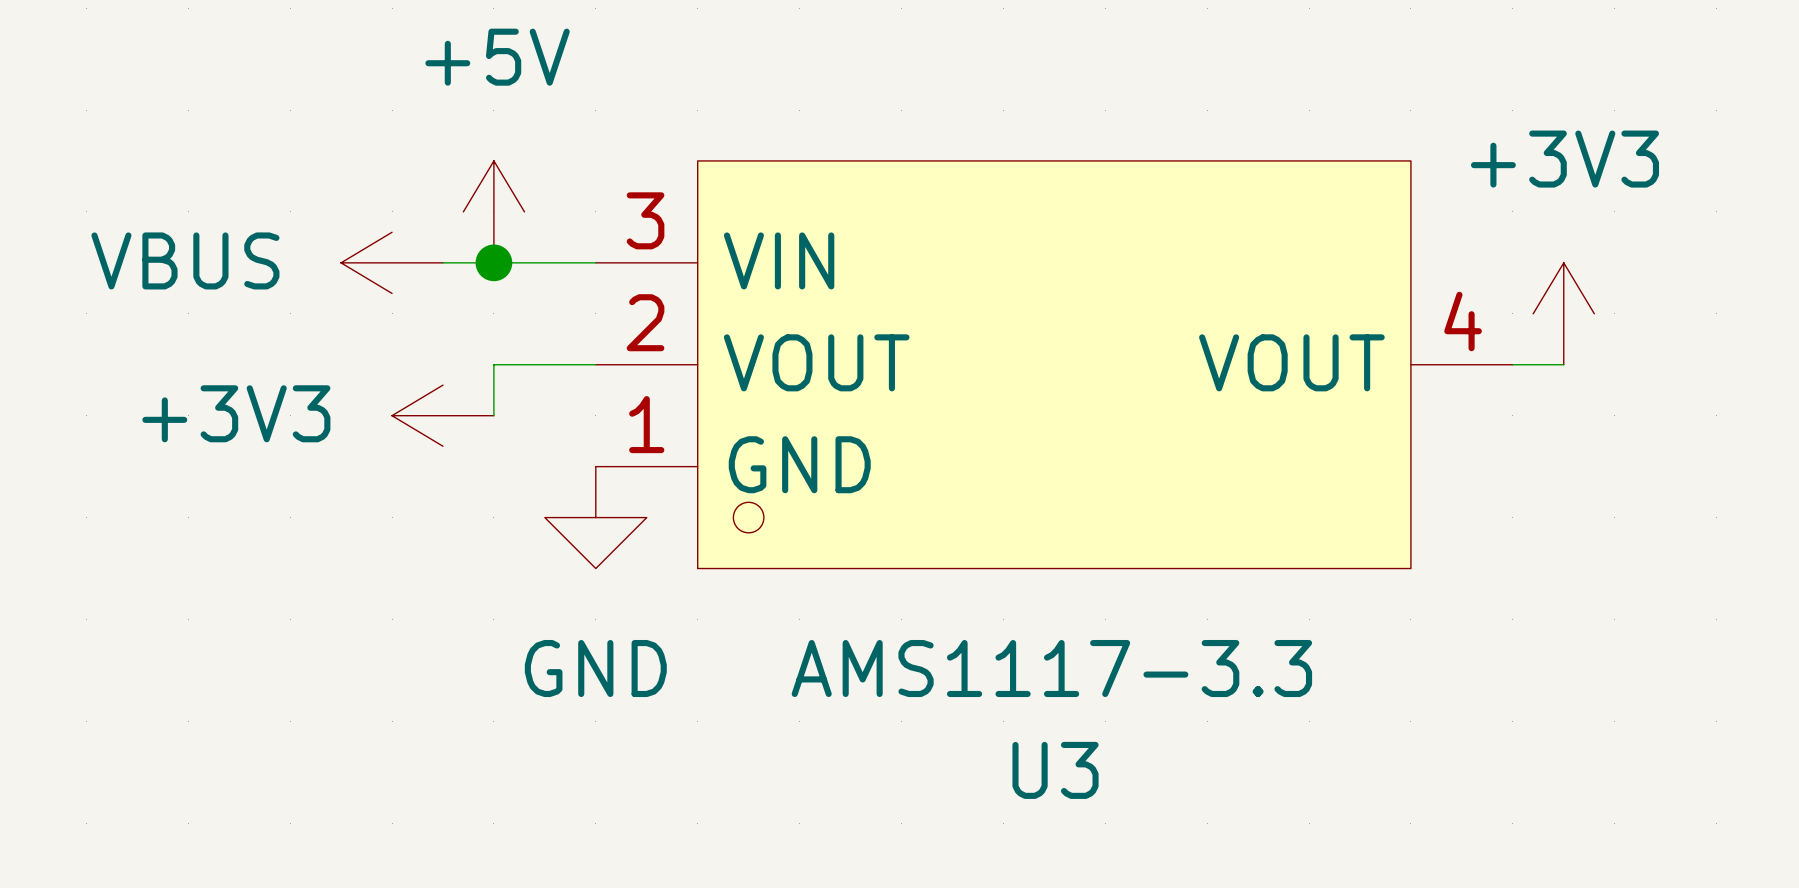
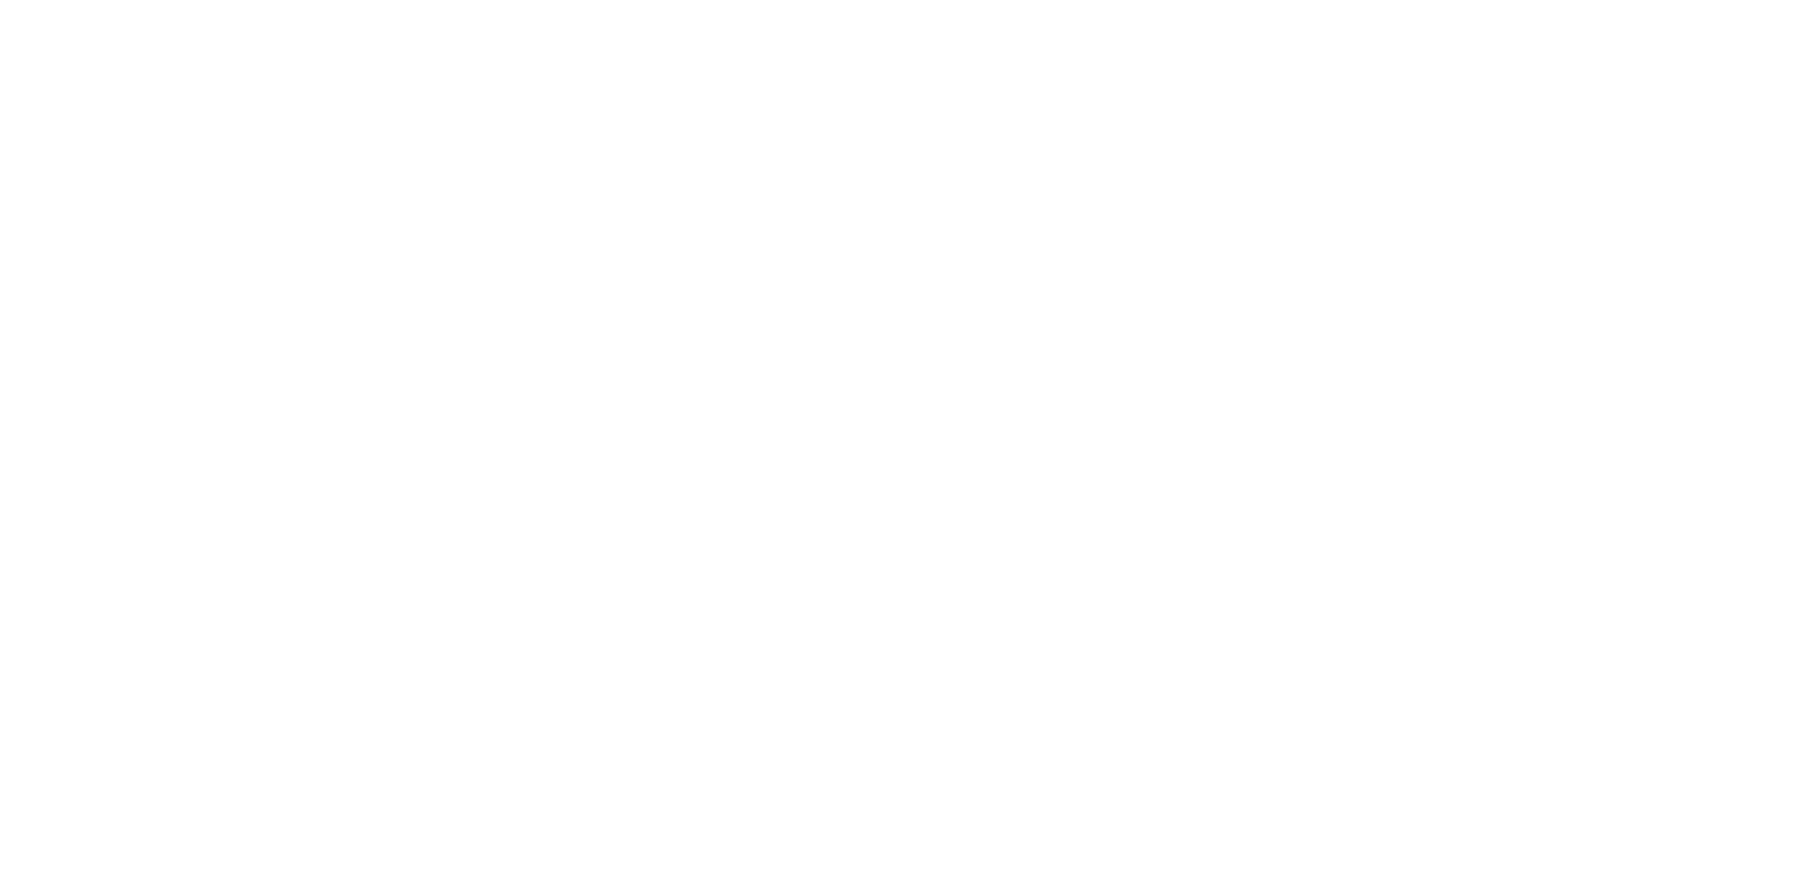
power symbol: +5V (493, 211) -> none
power symbol: VBUS (392, 262) -> none
wire: (442, 262) (595, 262) -> none
junction: (493, 262) -> none
power symbol: +3V3 (1563, 313) -> none
wire: (595, 364) (493, 364) (493, 415) -> none
U3: AMS1117-3.3 (1054, 364) -> none
wire: (1512, 364) (1563, 364) -> none
power symbol: +3V3 (442, 415) -> none
power symbol: GND (595, 517) -> none

